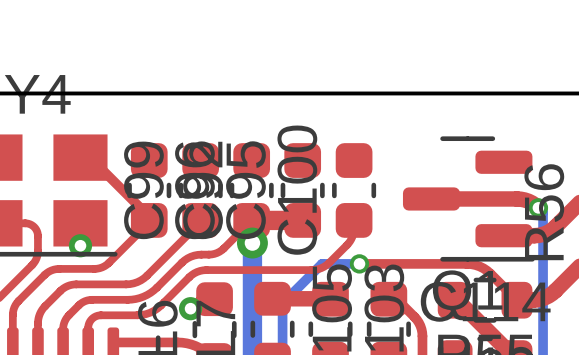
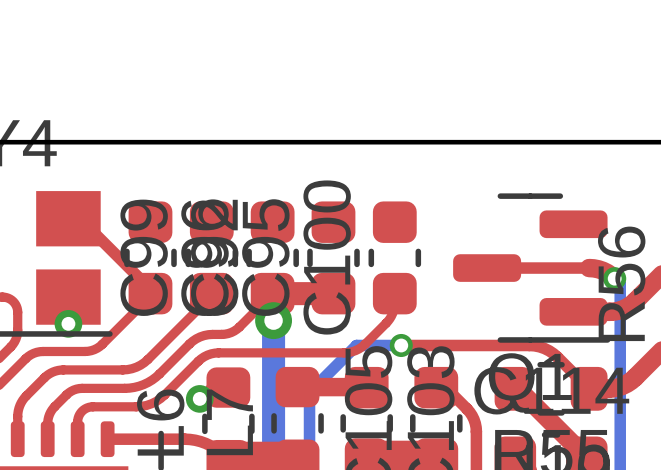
top track width: thick (431, 198) (516, 198) -> thin (487, 268) (589, 268)

